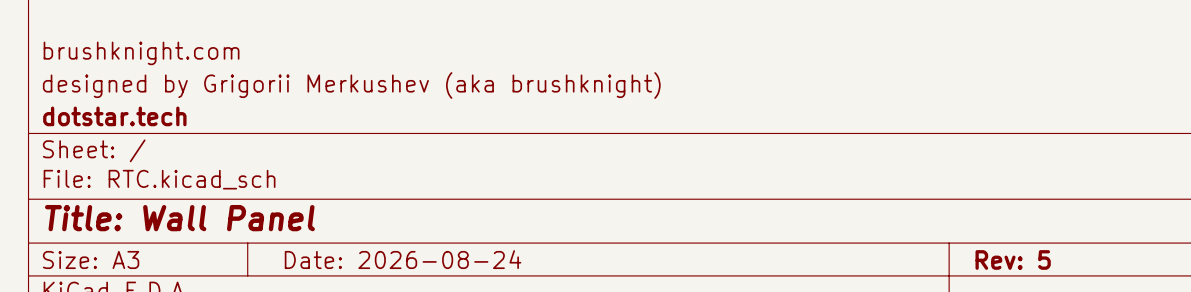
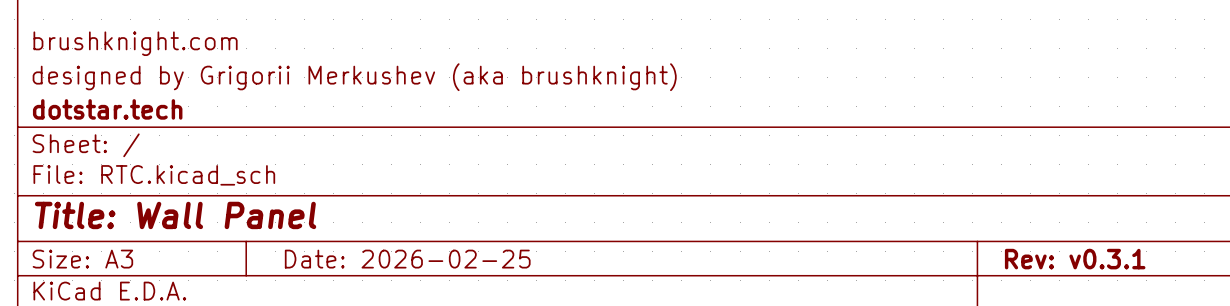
title block: Date: 2026-08-24 (403, 259) -> Date: 2026-02-25 (407, 259)
title block: Rev: 5 (1013, 259) -> Rev: v0.3.1 (1075, 259)

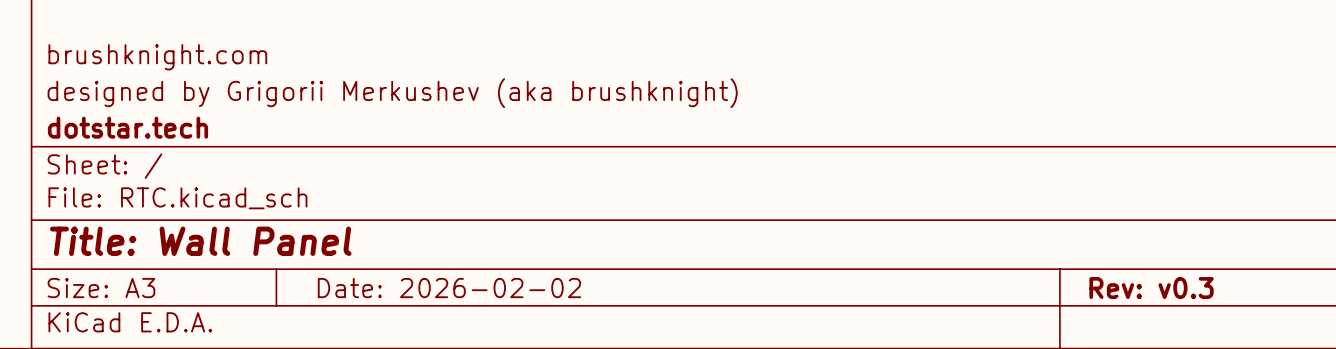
title block: Date: 2026-02-25 (407, 259) -> Date: 2026-02-02 (449, 288)
title block: Rev: v0.3.1 (1075, 259) -> Rev: v0.3 (1151, 288)

